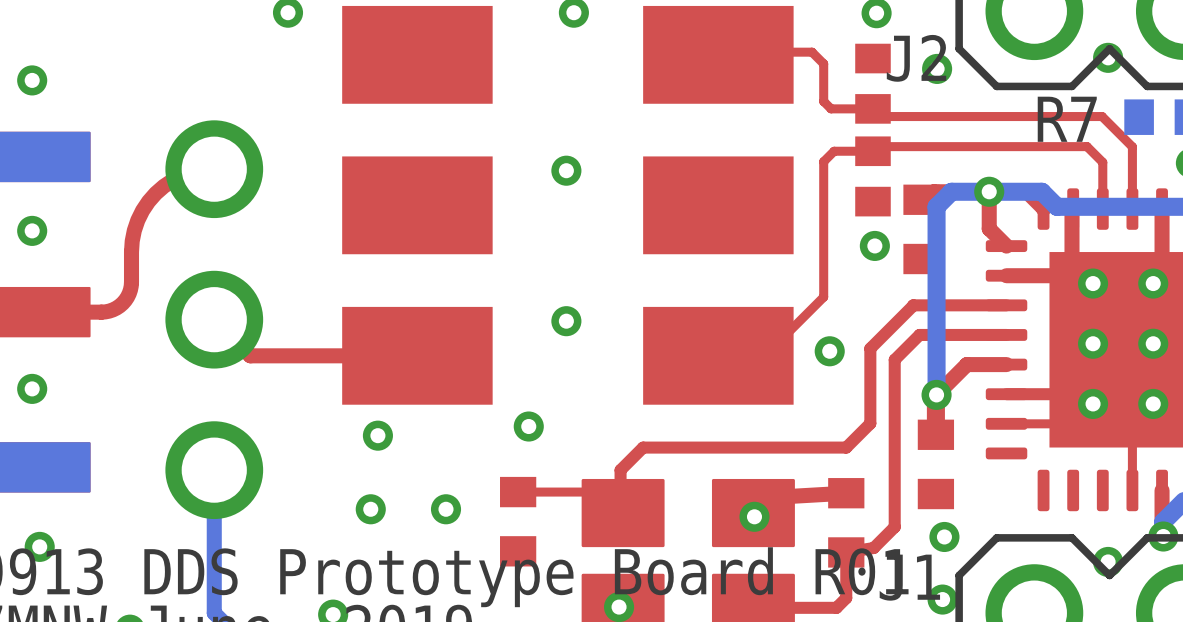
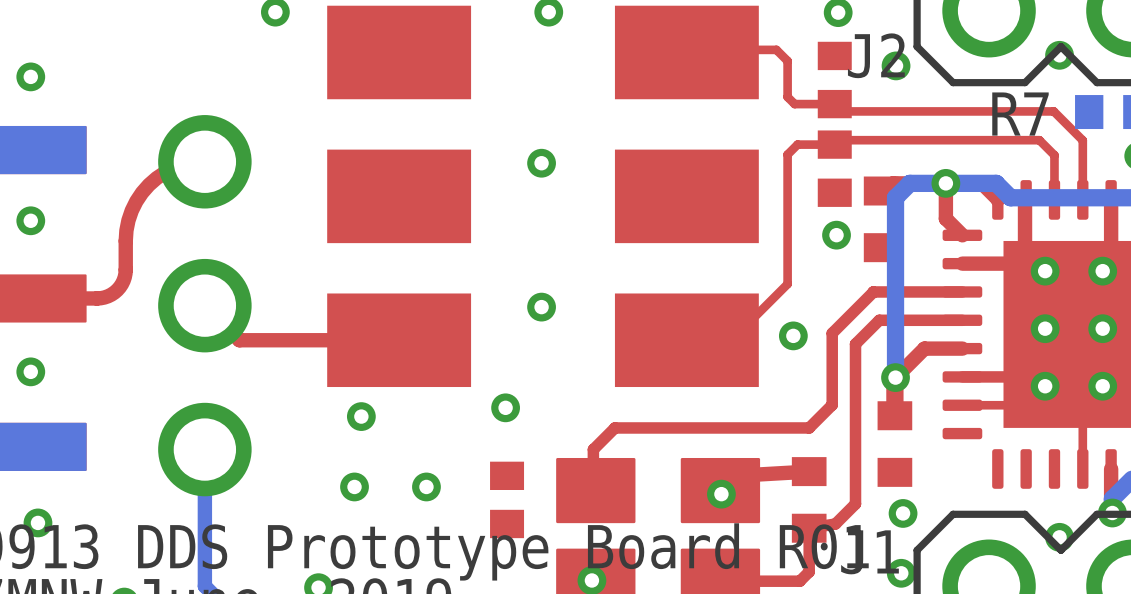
part footprint: [500, 476, 537, 567] -> [490, 461, 525, 539]
top track: (518, 492) (602, 492) (618, 508) -> none

